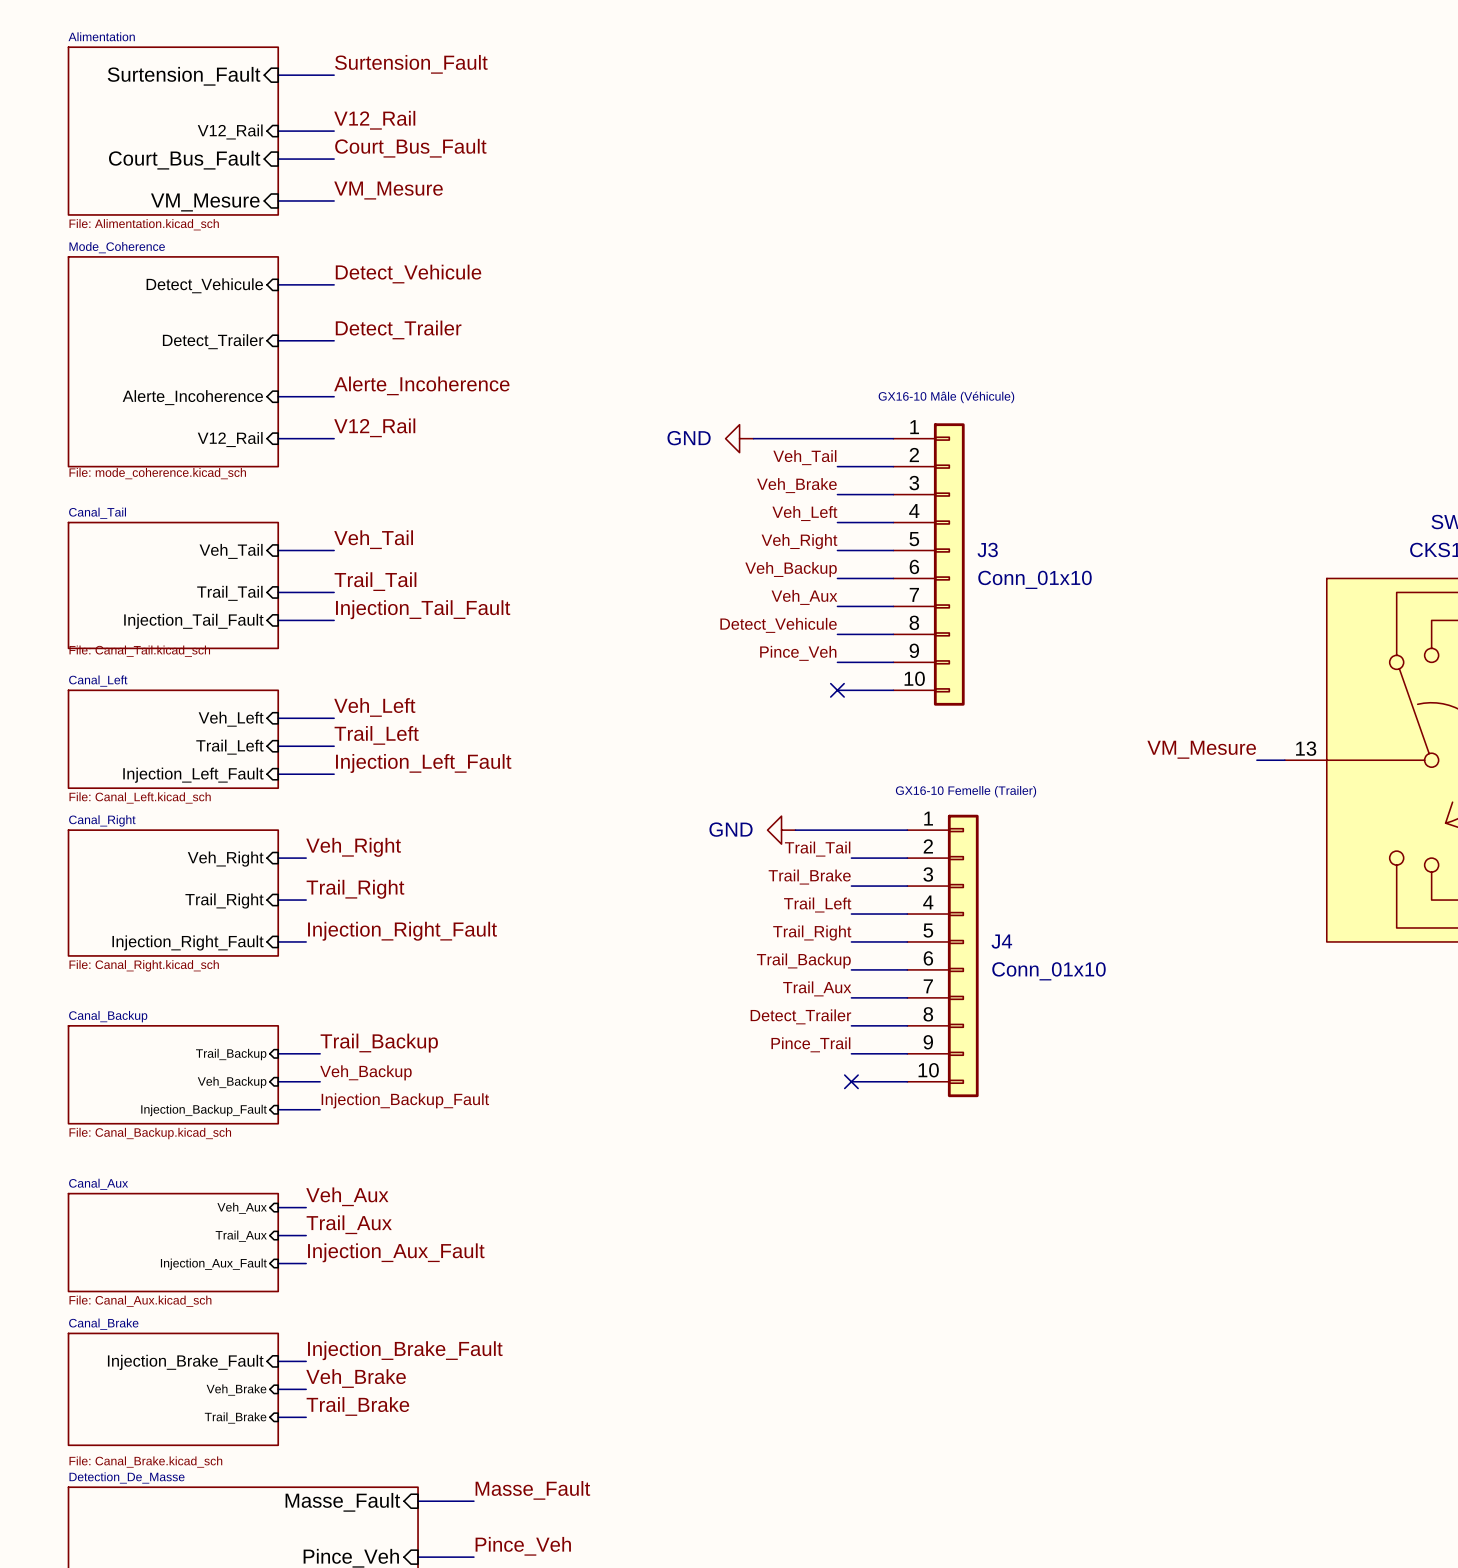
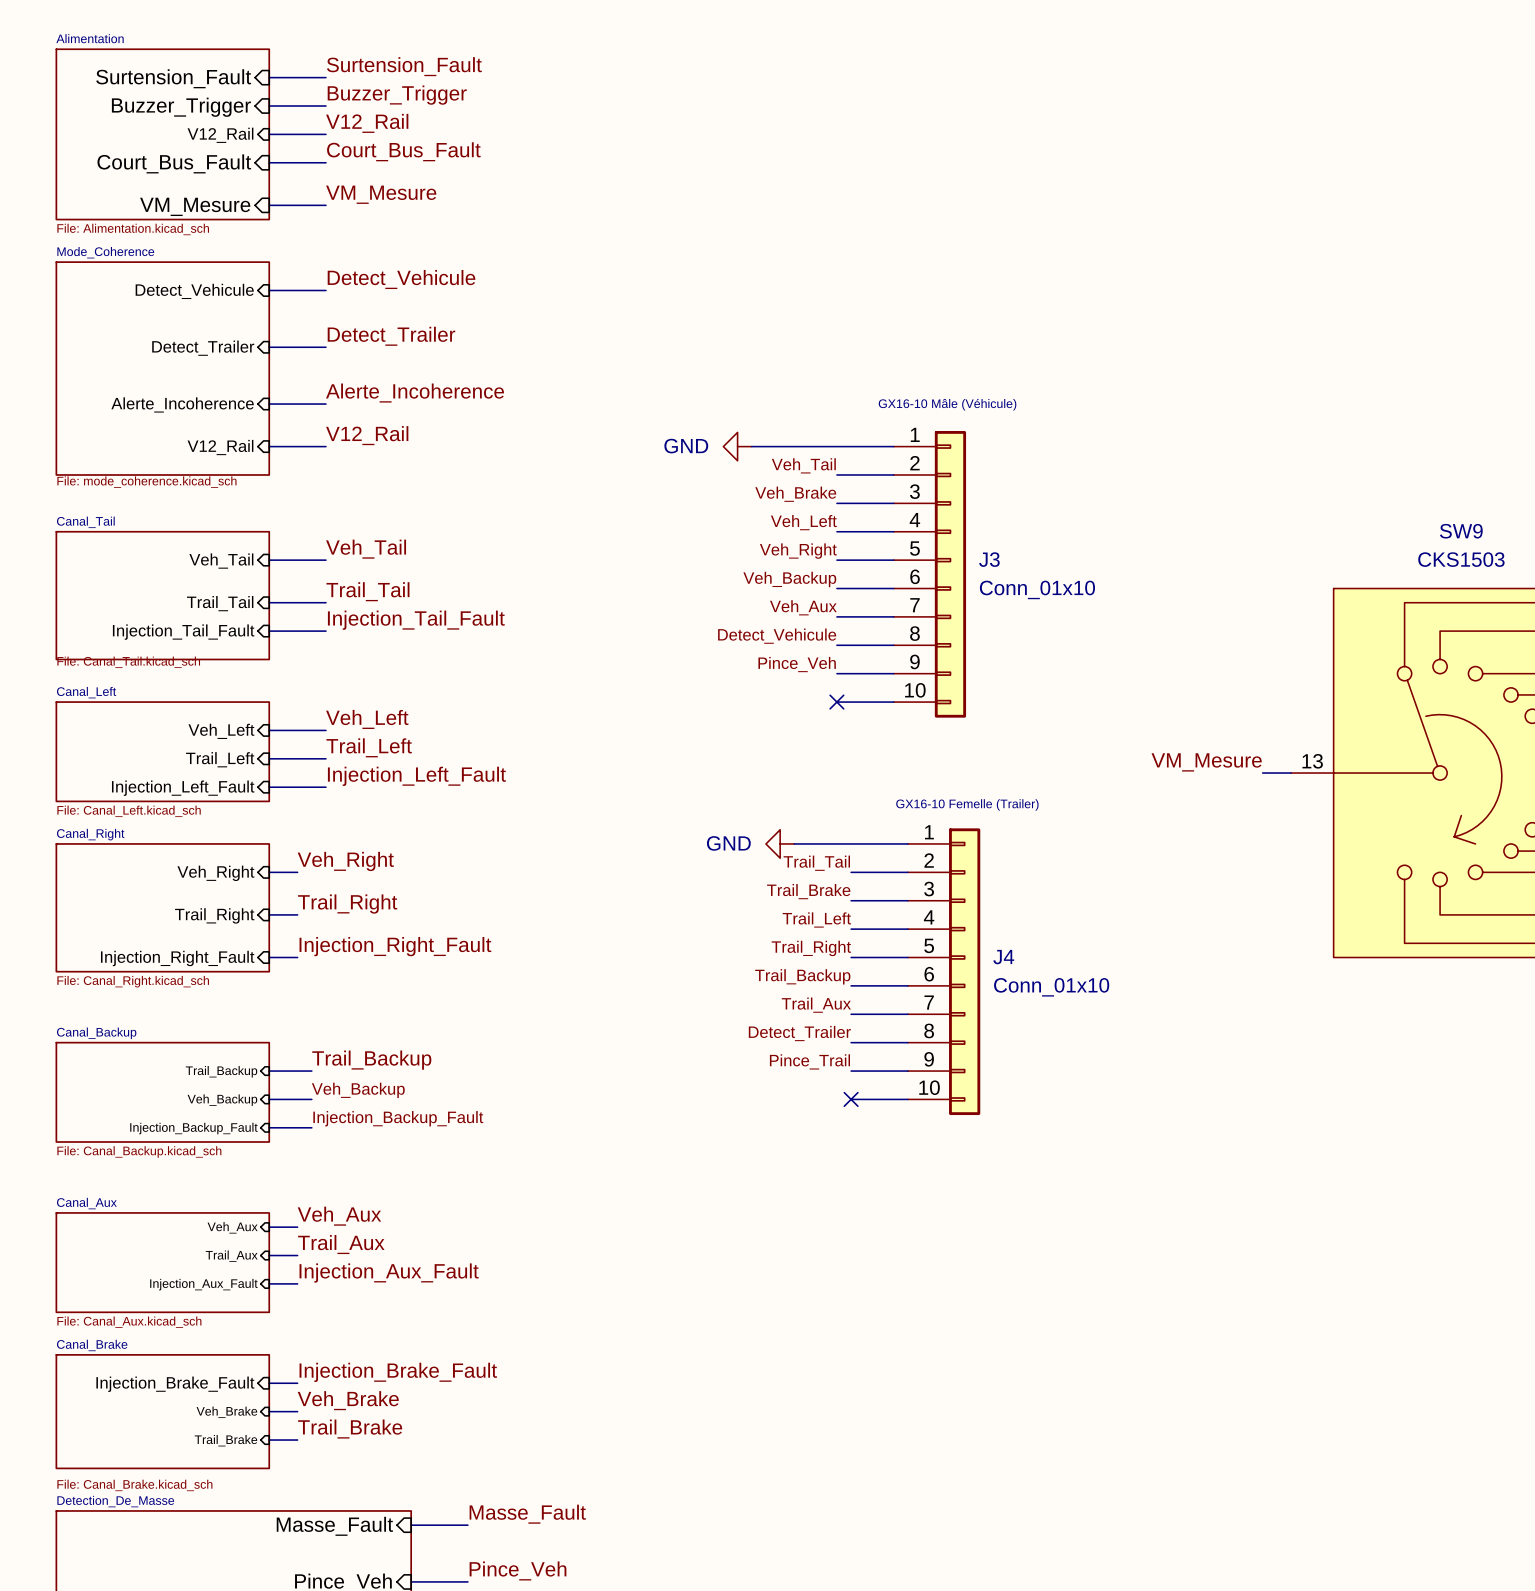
label: none -> Buzzer_Trigger (397, 95)
wire: none -> (269, 106) (326, 106)
sheet pin: none -> Buzzer_Trigger (181, 107)

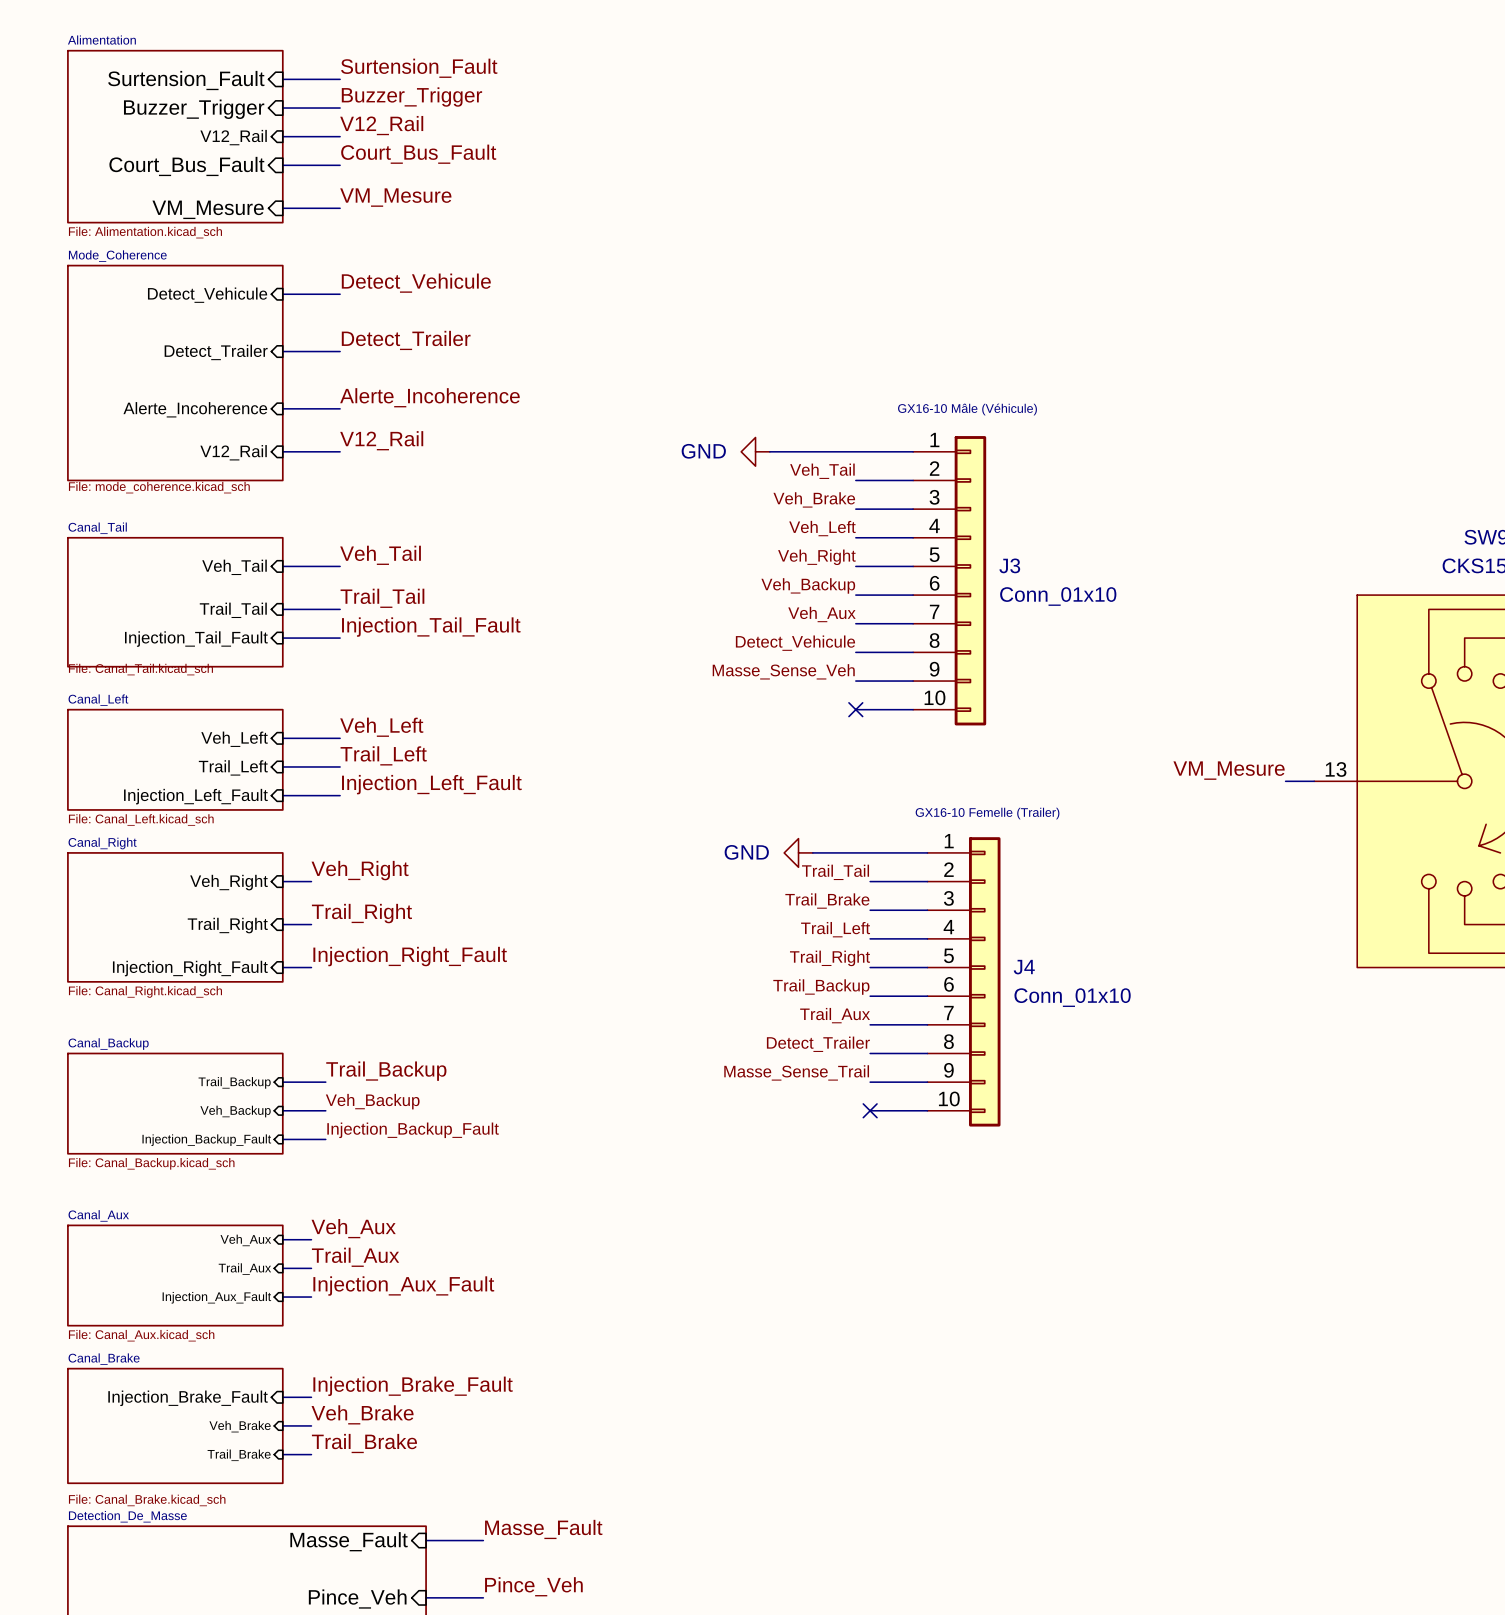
label: Pince_Veh (797, 664) -> Masse_Sense_Veh (783, 671)
label: Pince_Trail (809, 1061) -> Masse_Sense_Trail (796, 1072)

